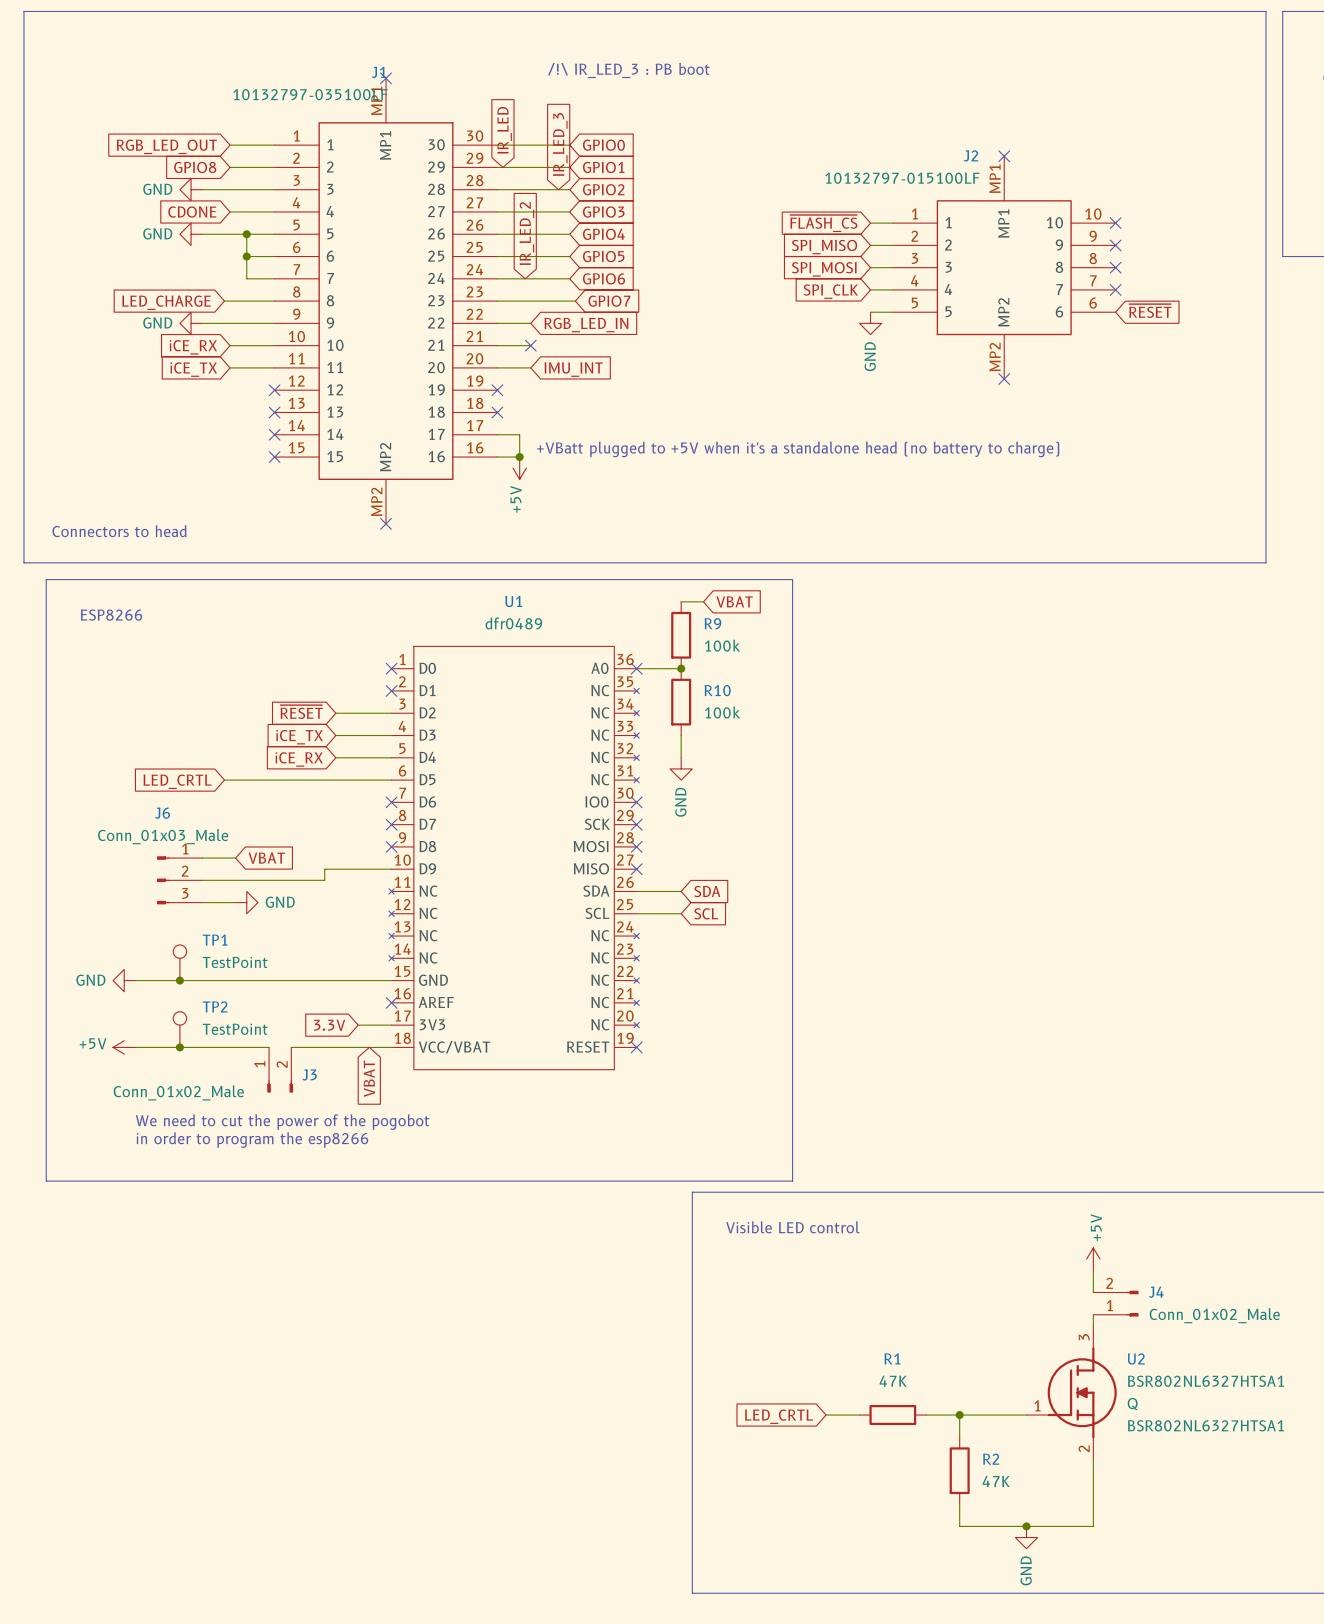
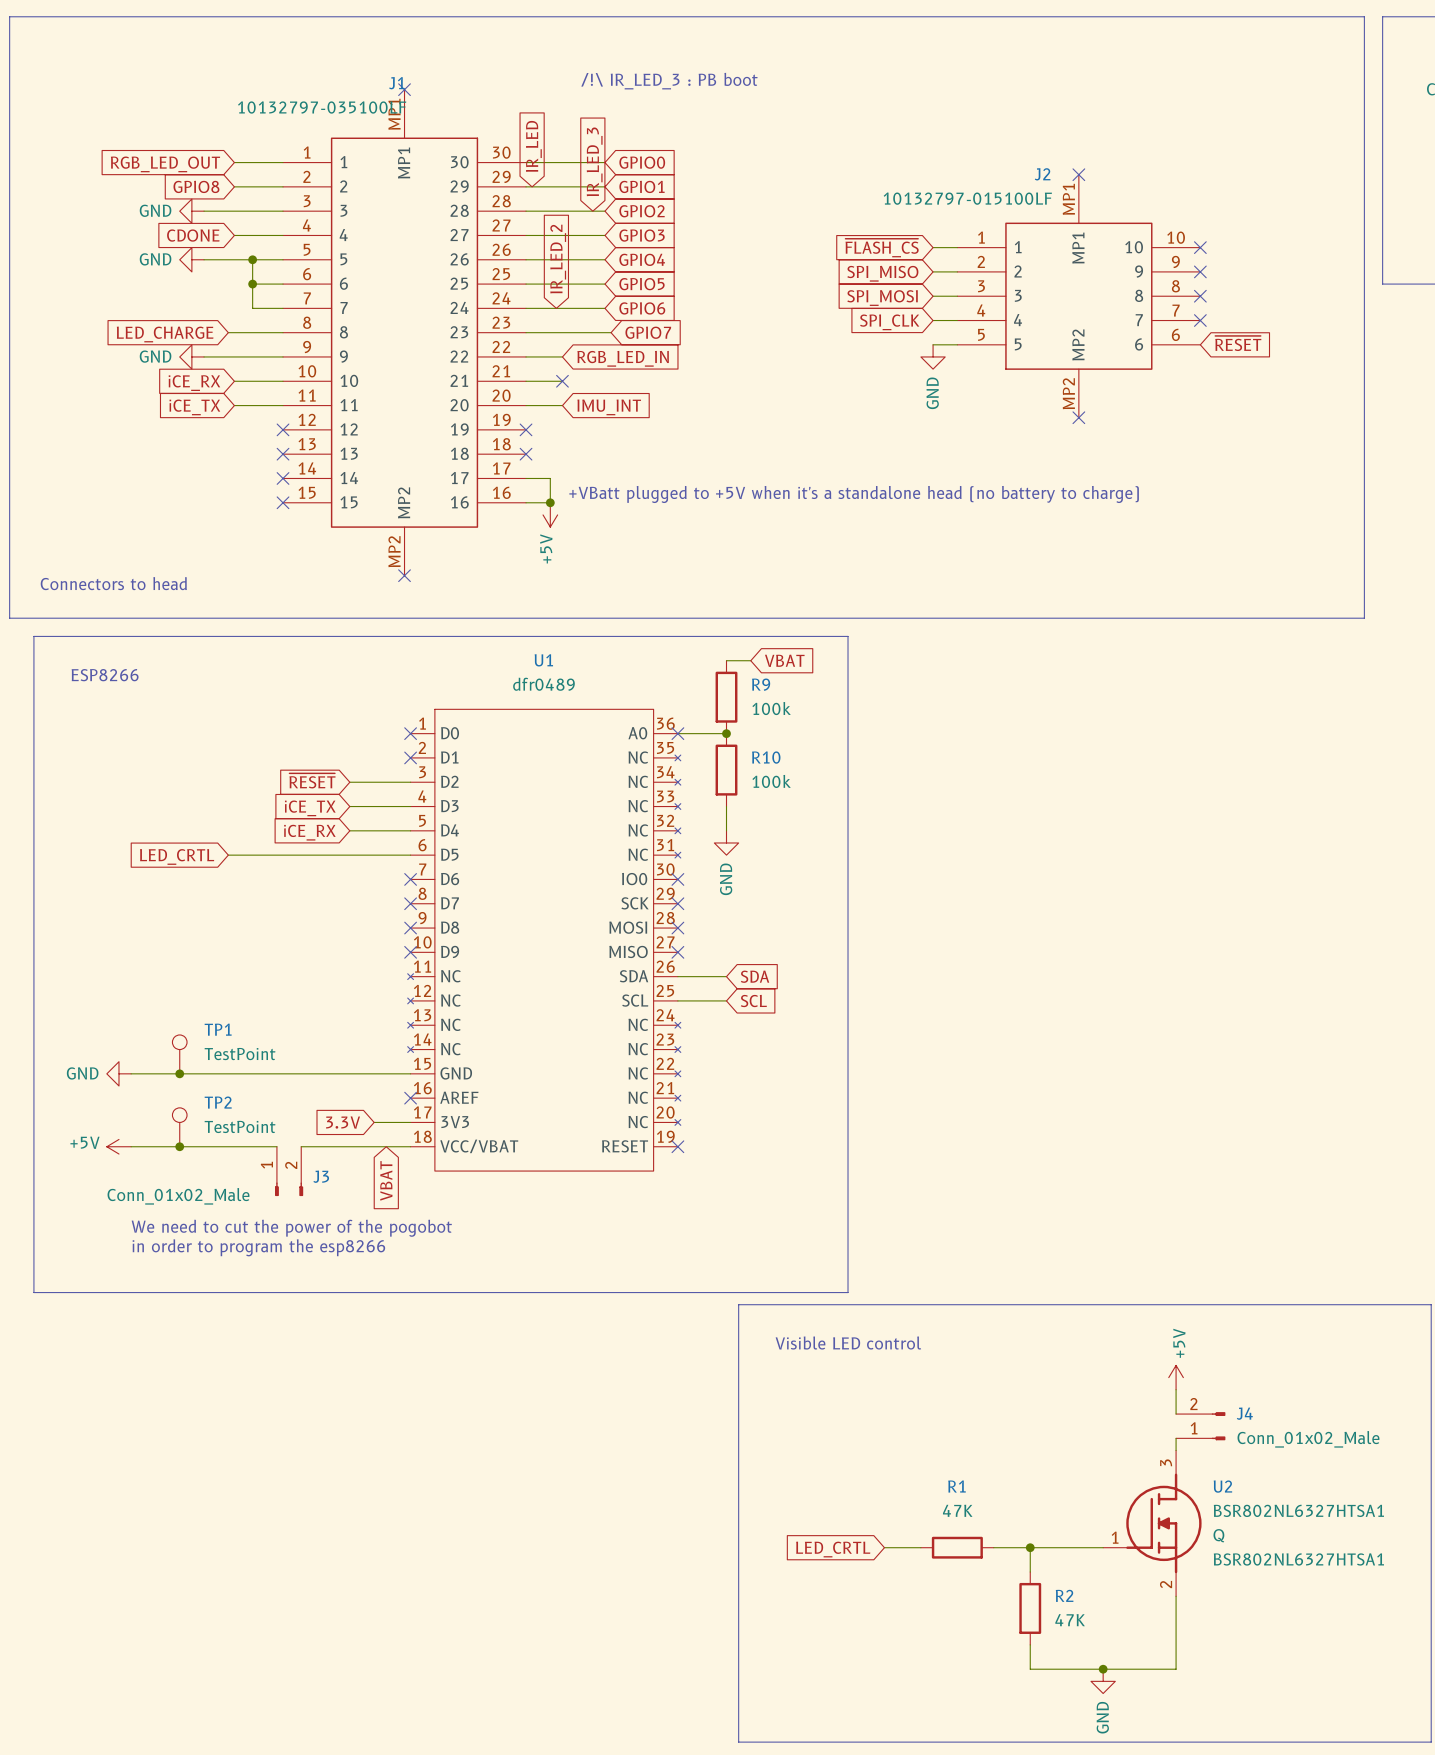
wire: (202, 858) (235, 858) -> none
global label: VBAT (266, 858) -> none
wire: (391, 869) (324, 869) (324, 880) (202, 880) -> none
no-connect mark: none -> (410, 952)
J6: Conn_01x03_Male (179, 880) -> none
wire: (202, 902) (235, 902) -> none
power symbol: GND (246, 902) -> none

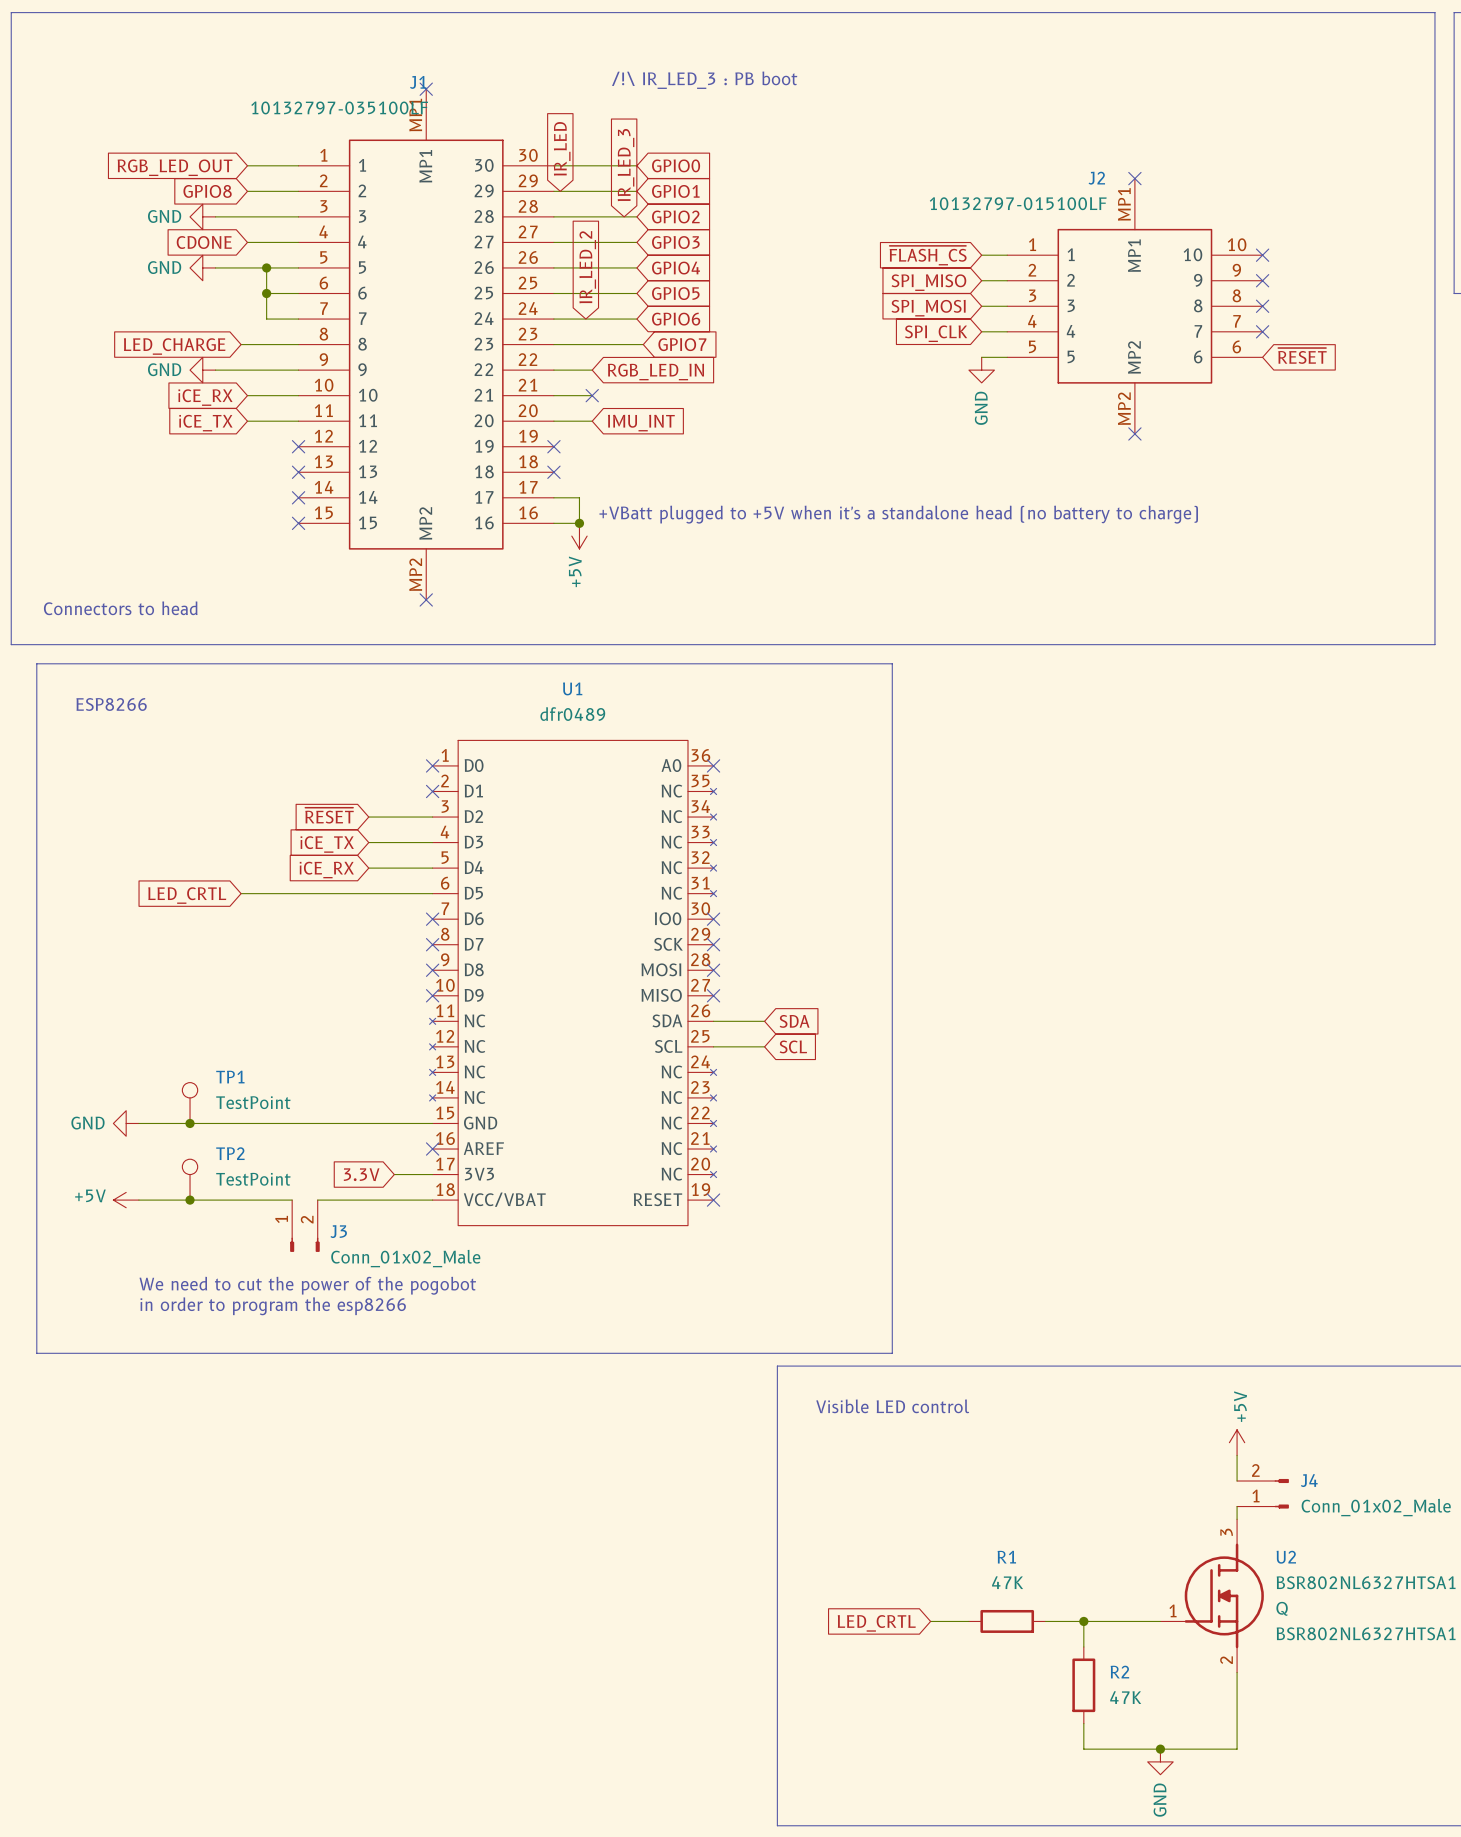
wire: (726, 660) (750, 660) -> none
global label: VBAT (784, 660) -> none
R9: 100k (726, 697) -> none
wire: (677, 733) (726, 733) -> none
junction: (726, 733) -> none
R10: 100k (726, 770) -> none
wire: (726, 806) (726, 830) -> none
power symbol: GND (726, 842) -> none
global label: VBAT (386, 1180) -> none
J3 value position: Conn_01x02_Male (178, 1196) -> Conn_01x02_Male (405, 1258)

